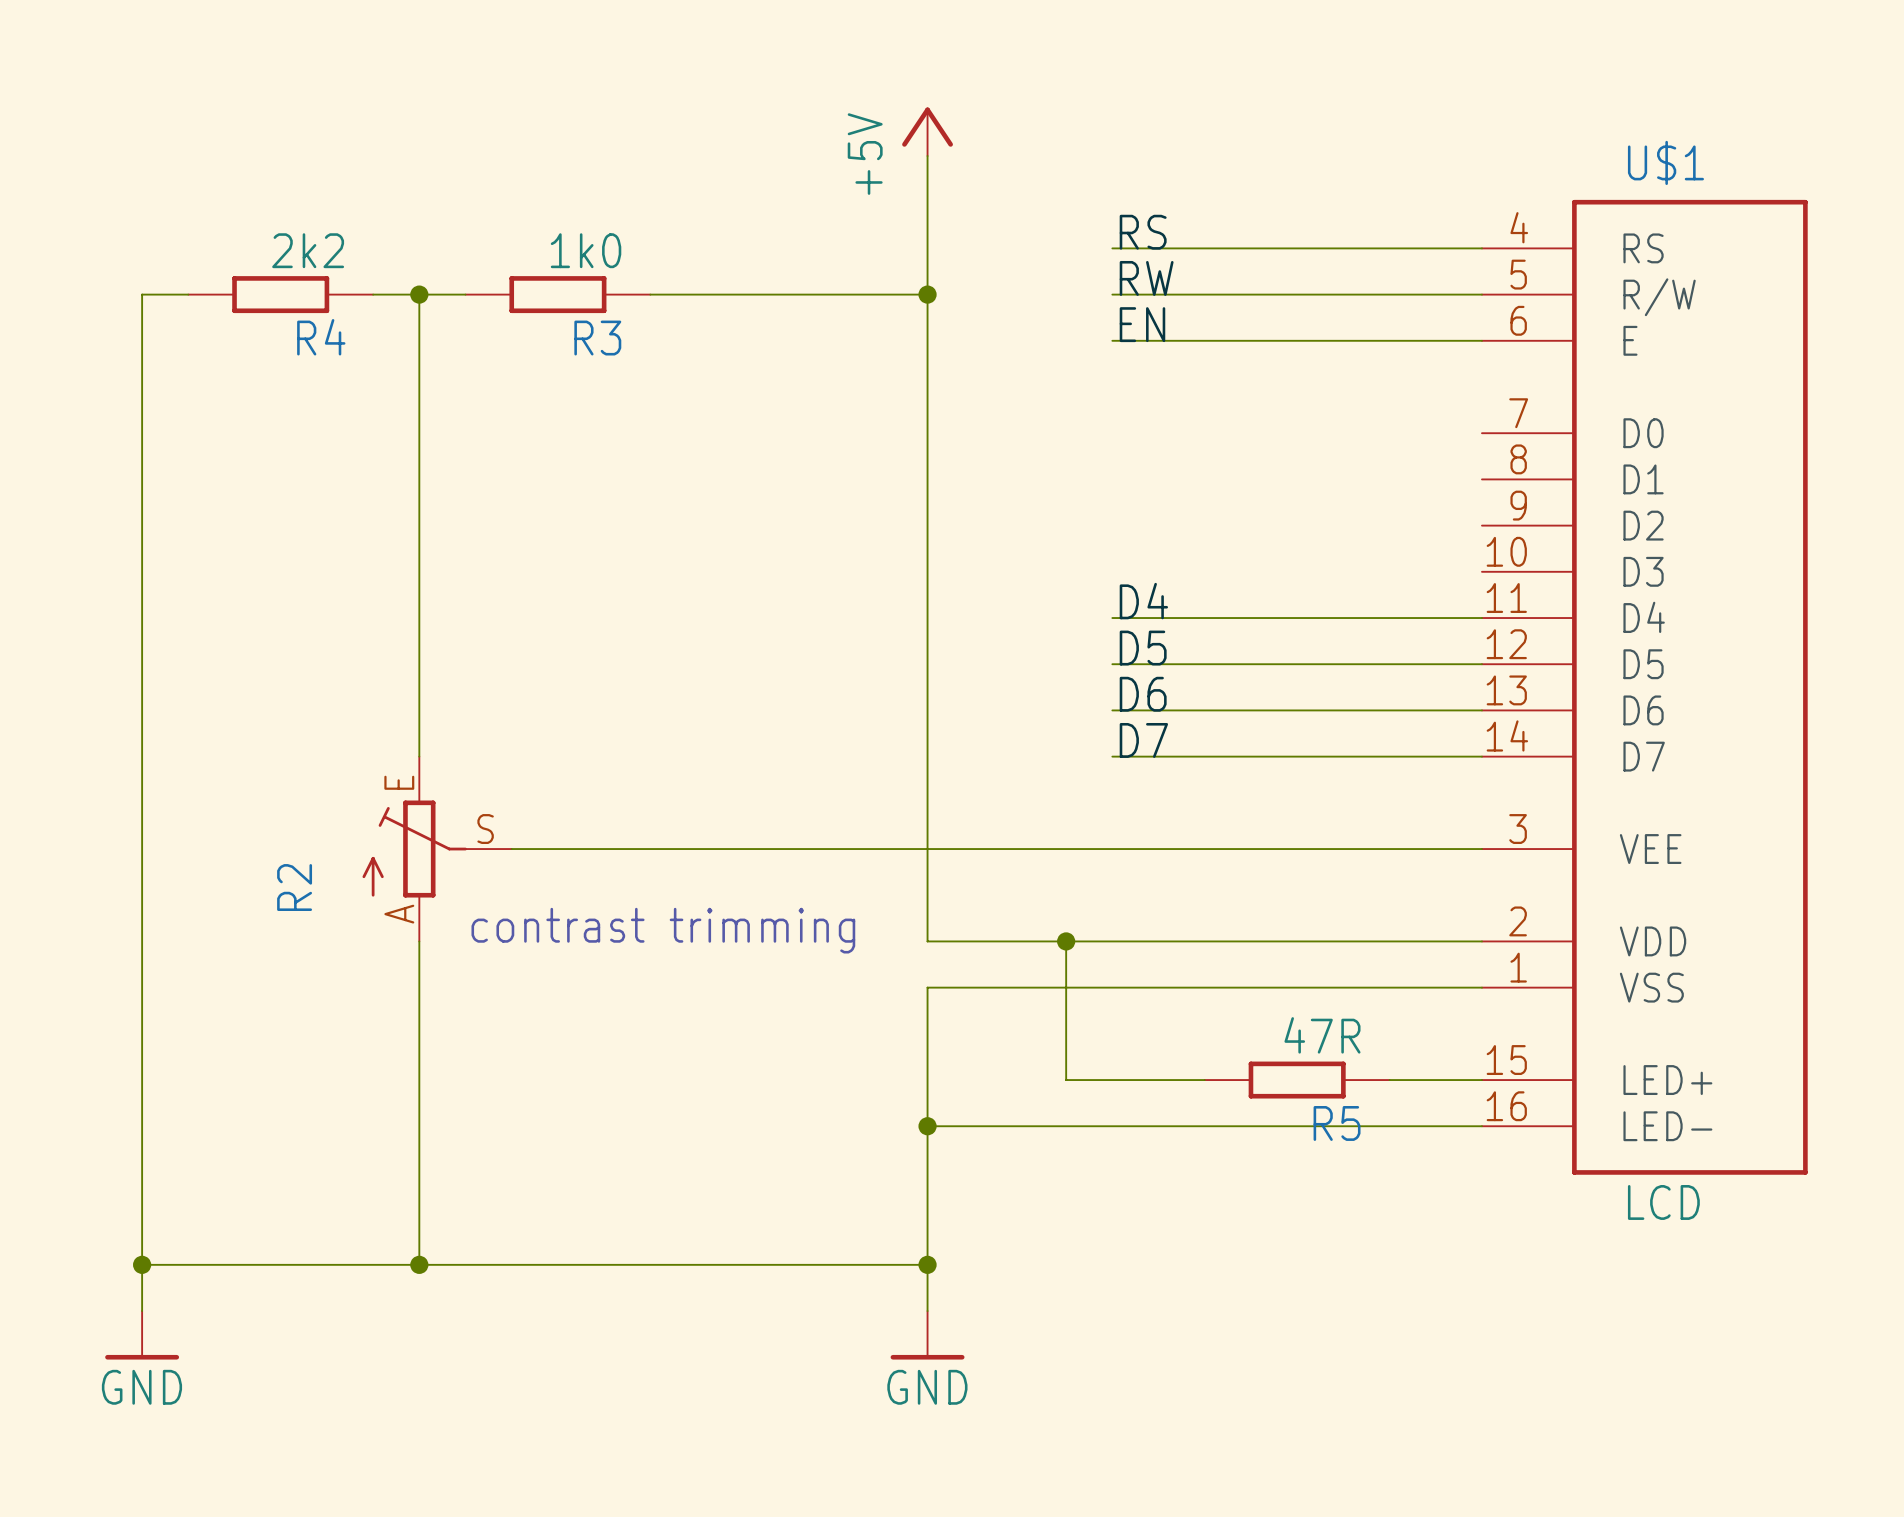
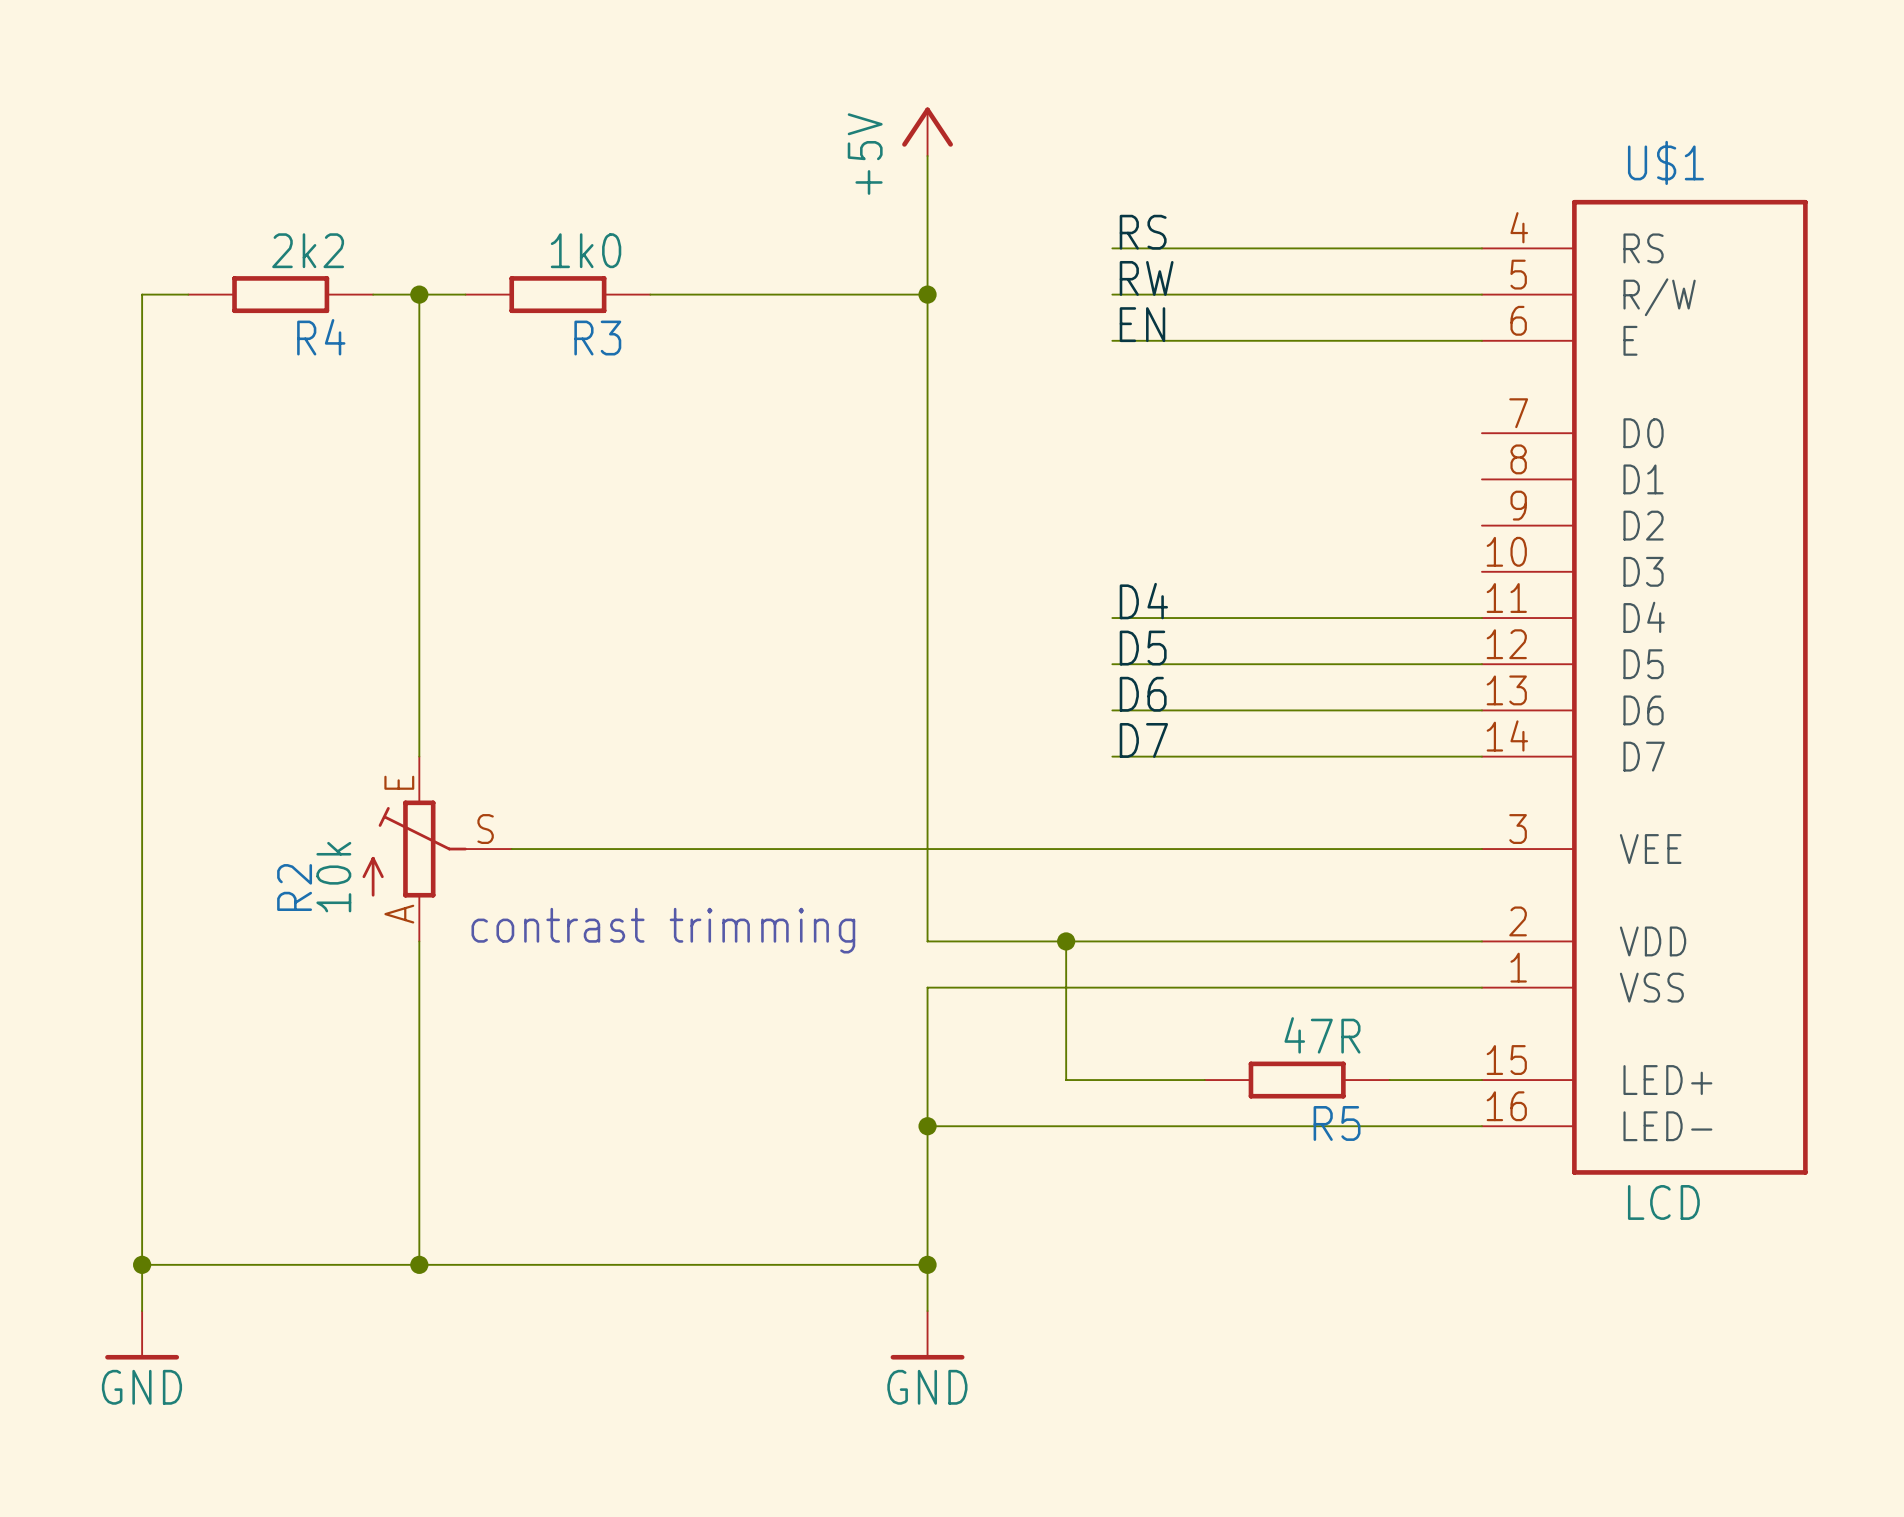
R2 value: none -> 10k (333, 877)

